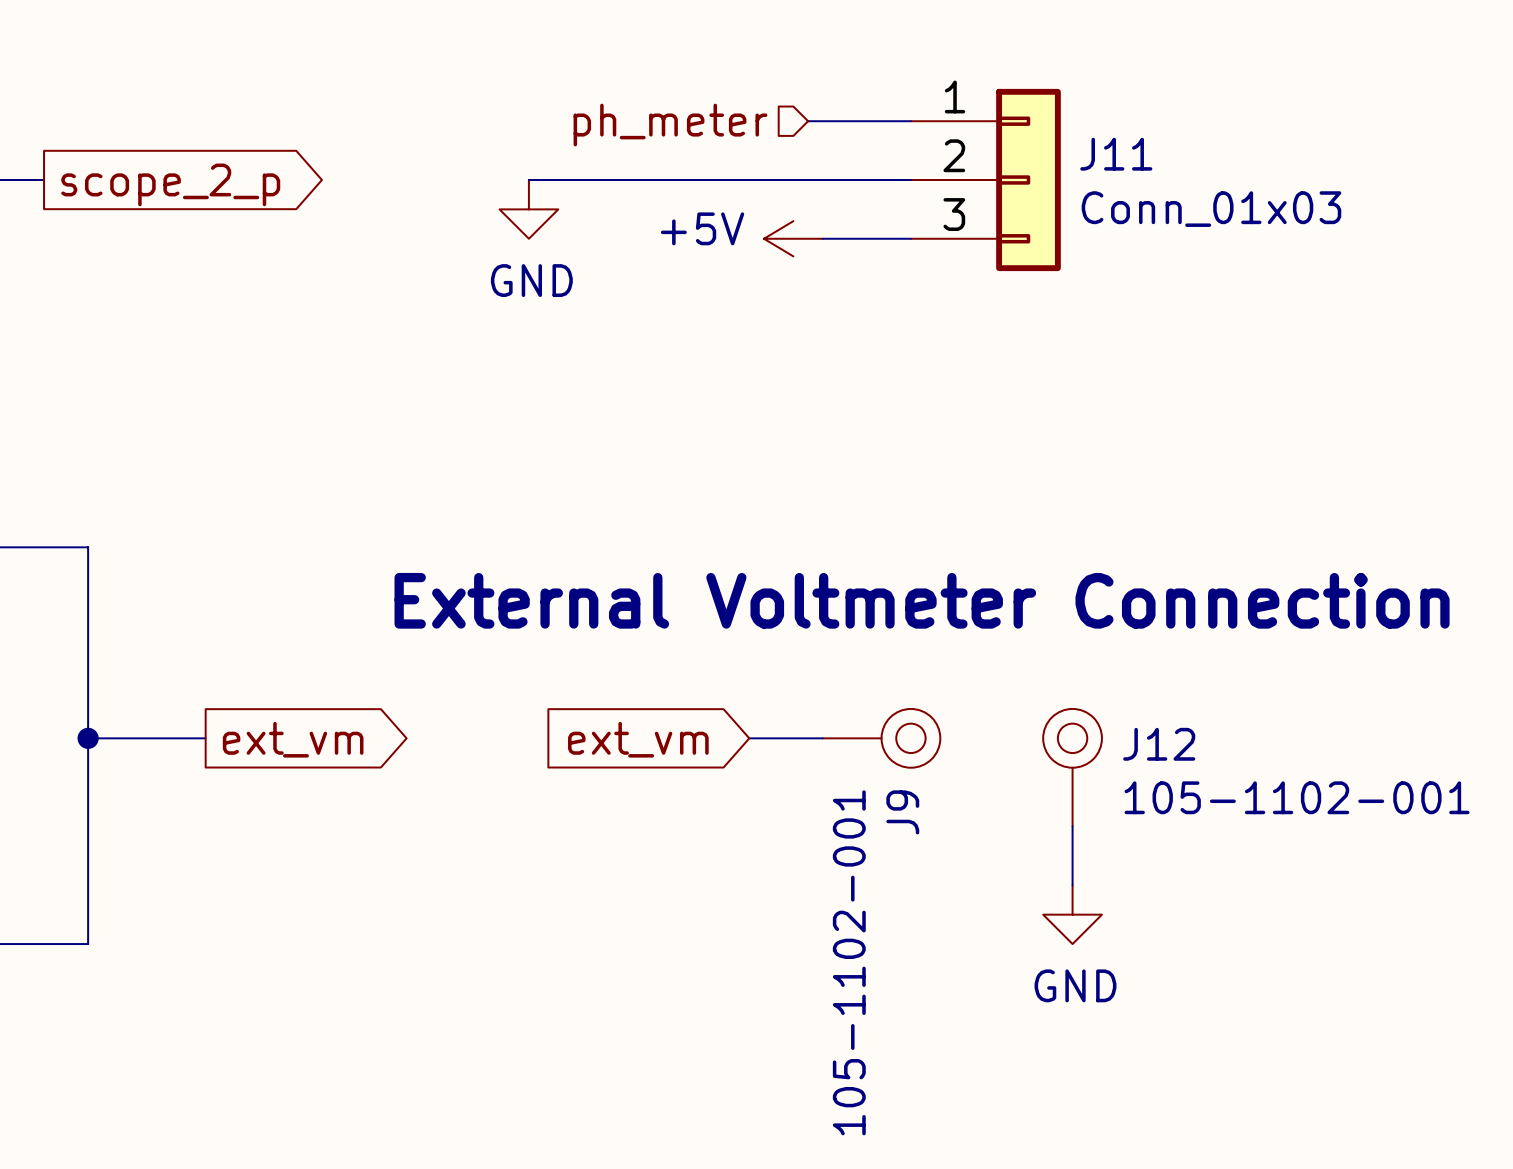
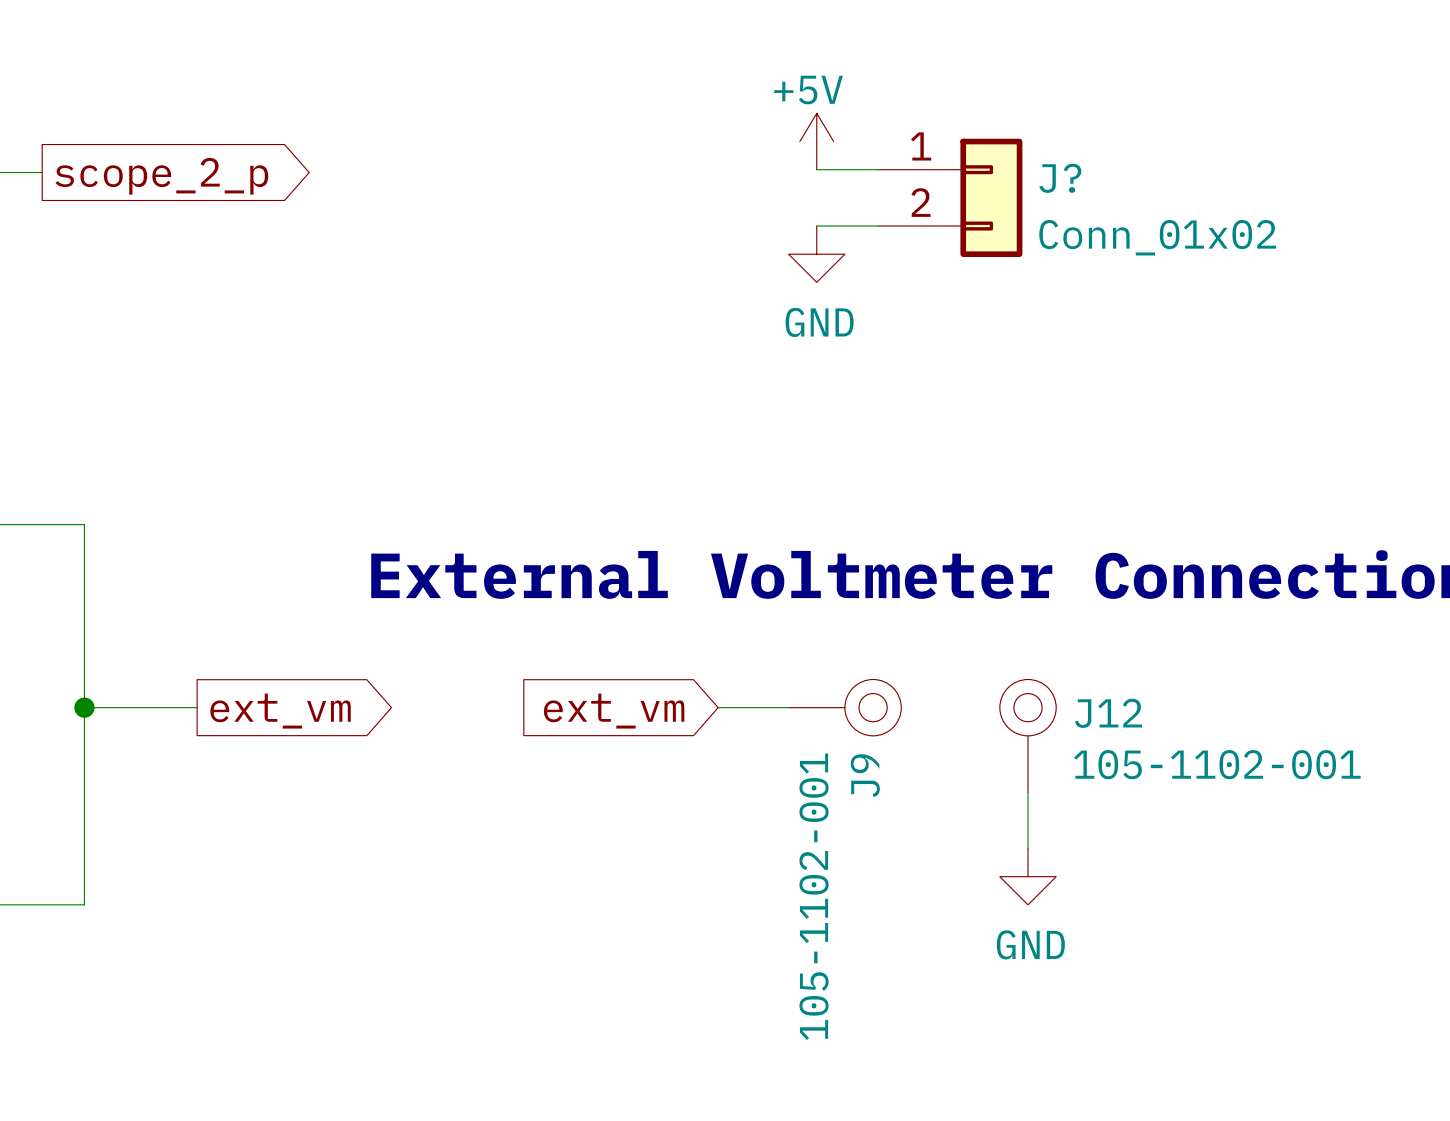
wire: (808, 121) (910, 121) -> none
hierarchical label: ph_meter (670, 125) -> none
wire: none -> (816, 169) (878, 169)
wire: (528, 179) (910, 179) -> none
J11: Conn_01x03 (985, 179) -> none
J?: none -> Conn_01x02 (950, 197)
power symbol position: GND (528, 209) -> GND (816, 254)
power symbol text position: +5V (702, 228) -> +5V (808, 90)
wire: none -> (816, 226) (878, 226)
power symbol rotation: 0° (793, 238) -> 90° clockwise (816, 141)
power symbol position: +5V (793, 238) -> +5V (816, 141)
wire: (822, 238) (910, 238) -> none

